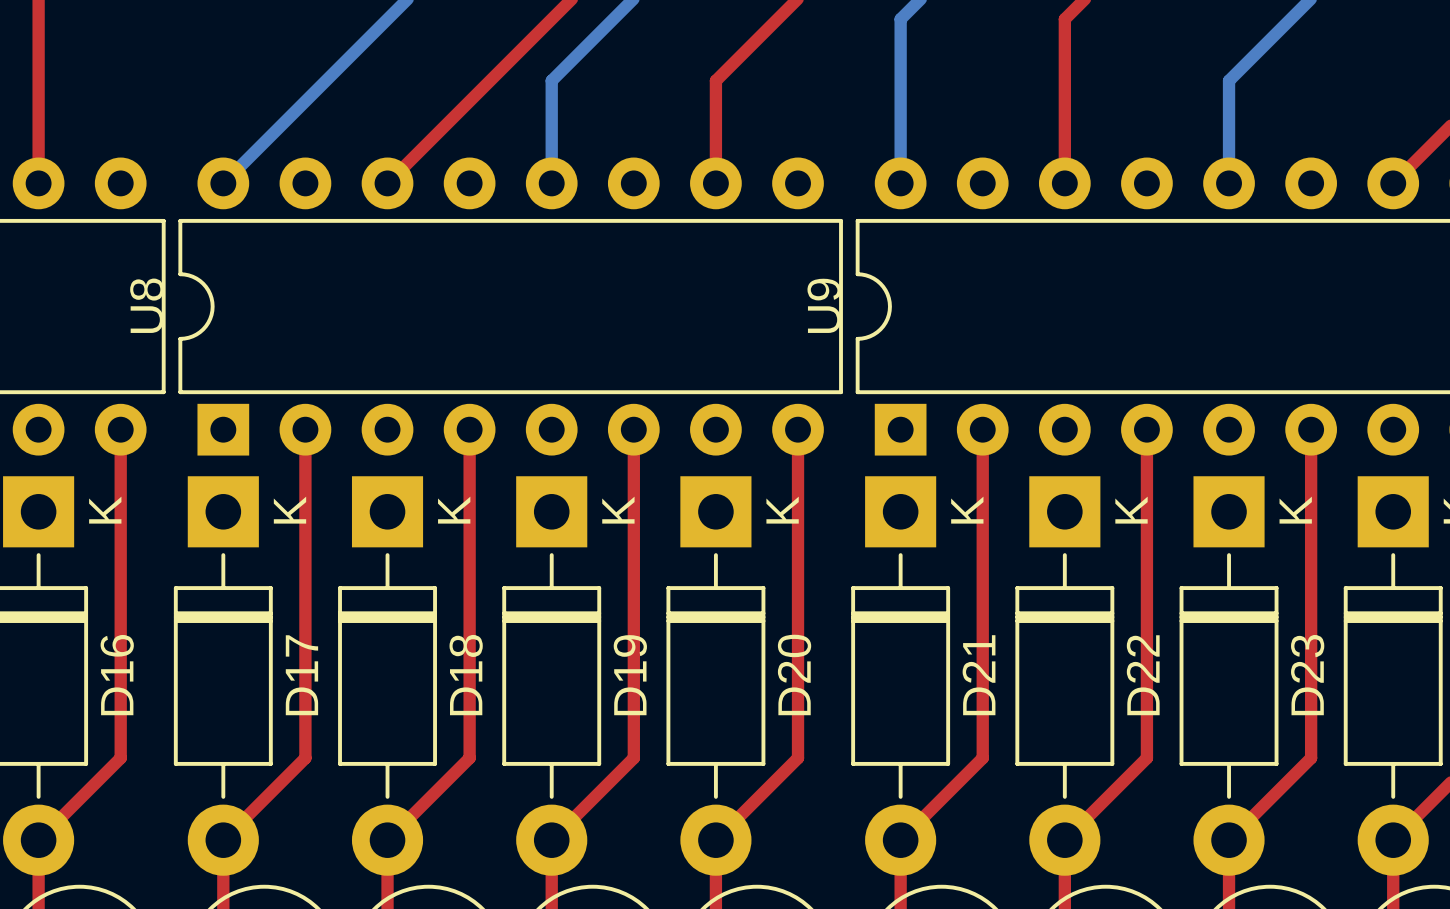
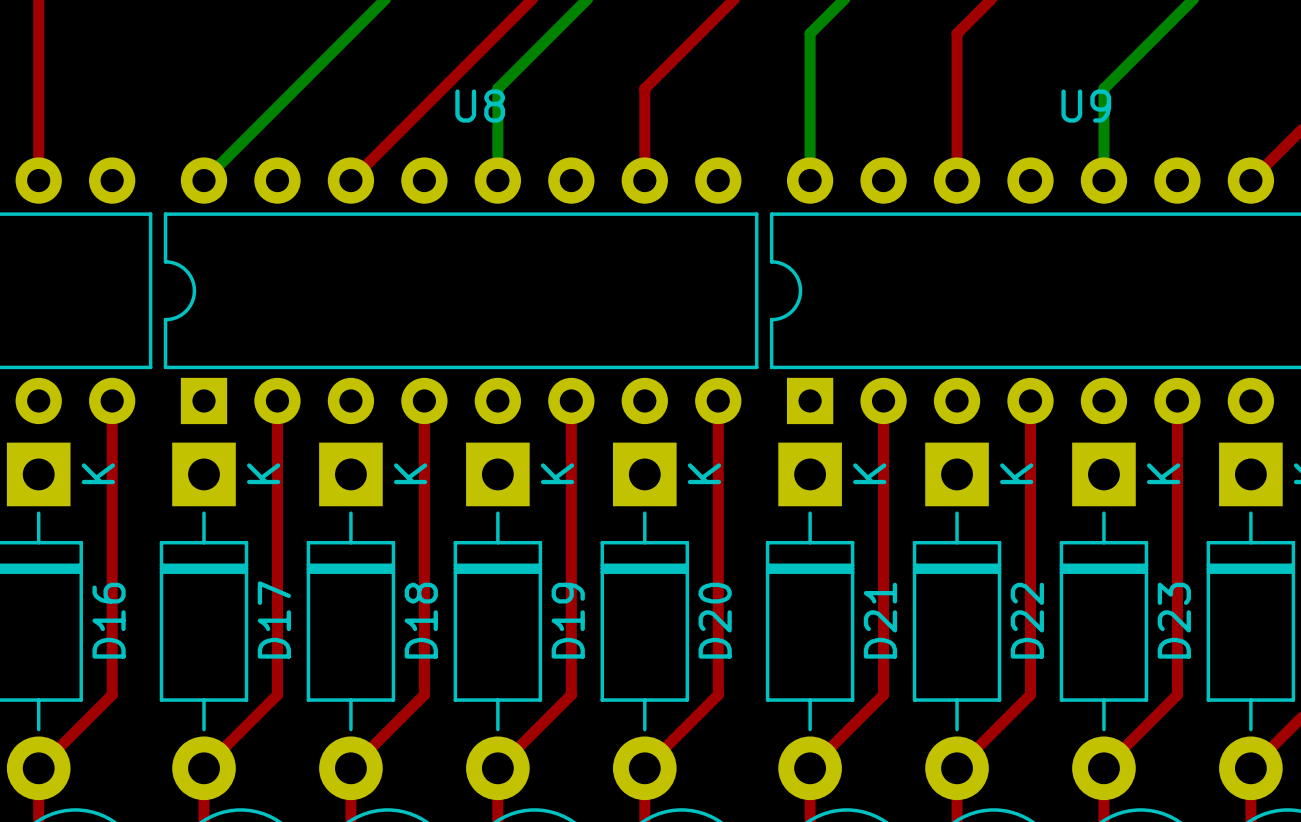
U8 name rotation: 0° (146, 305) -> 90° clockwise (480, 106)
U8 name position: U8 (146, 305) -> U8 (480, 106)
U9 name rotation: 0° (824, 305) -> 90° clockwise (1086, 106)
U9 name position: U9 (824, 305) -> U9 (1086, 106)

